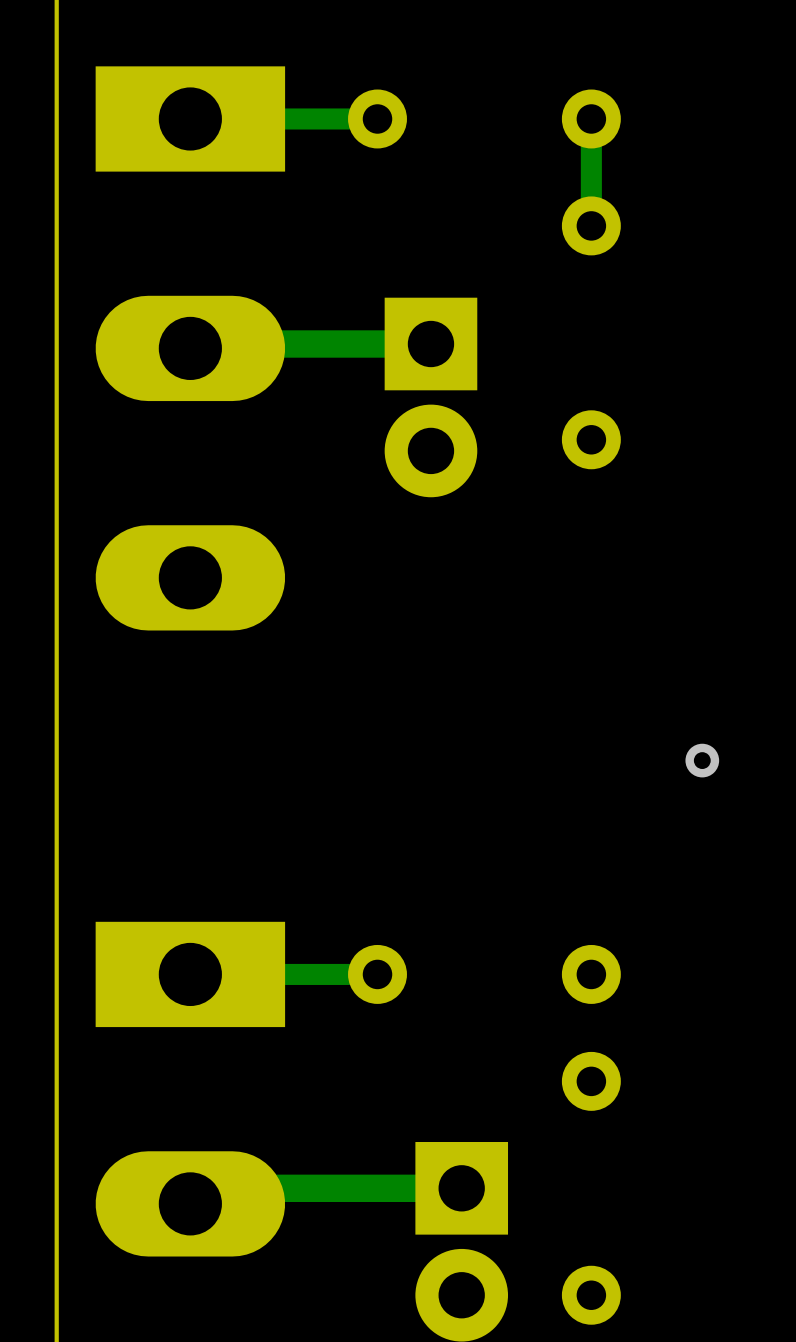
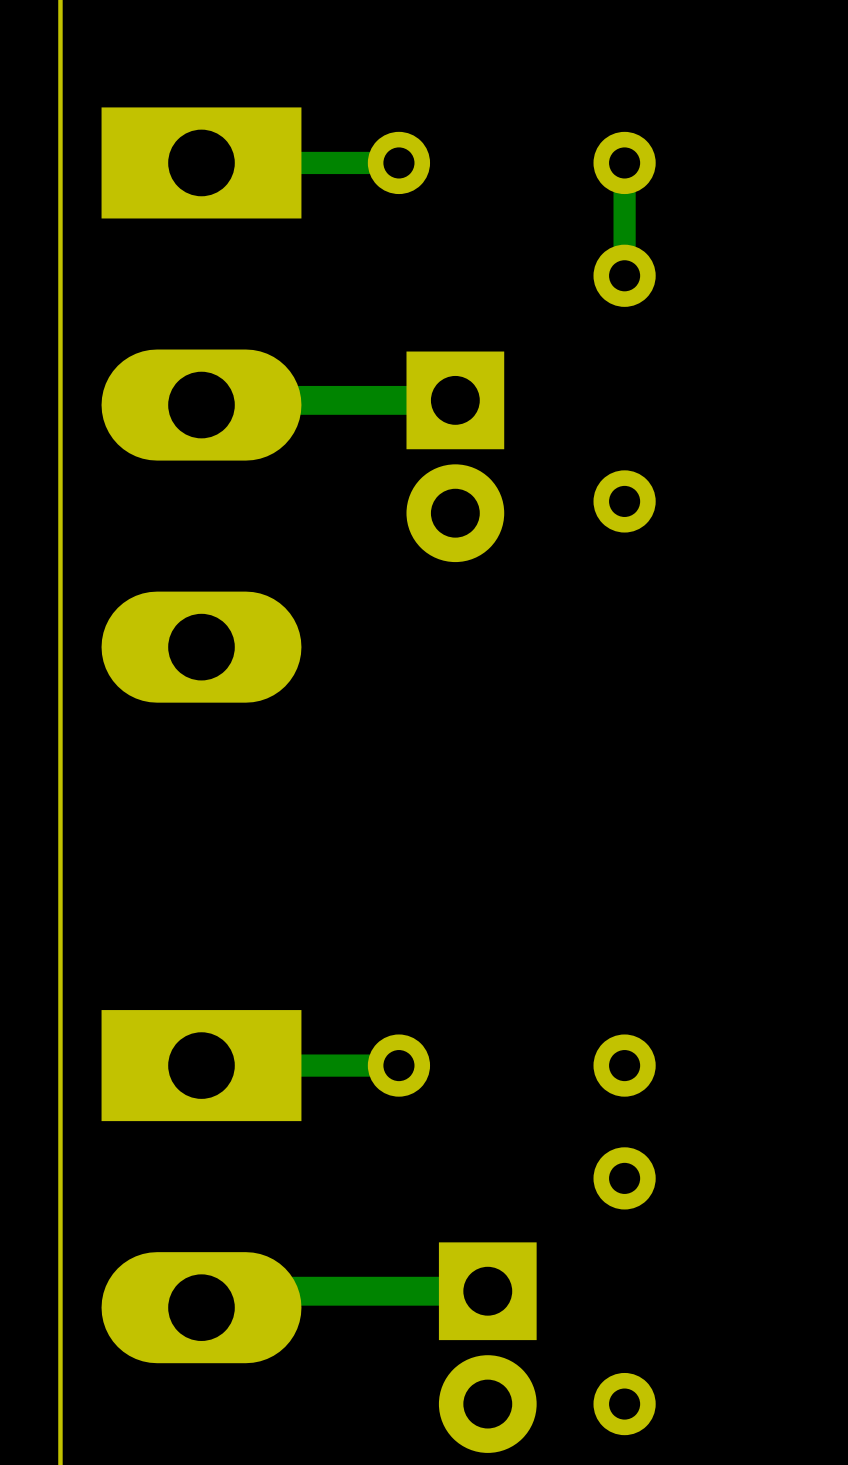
via: (702, 760) -> none

